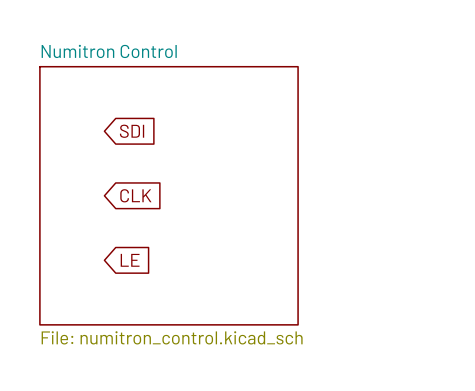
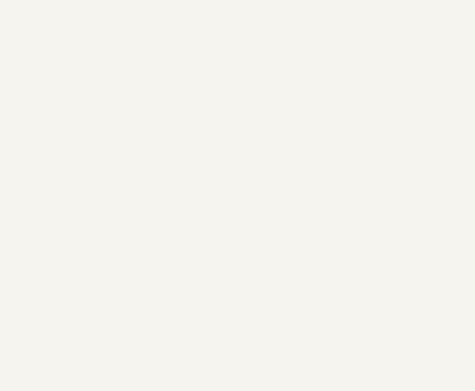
global label: SDI (132, 131) -> none
global label: CLK (135, 195) -> none
sheet Numitron Control: File: numitron_control.kicad_sch (168, 195) -> none
global label: LE (130, 260) -> none

